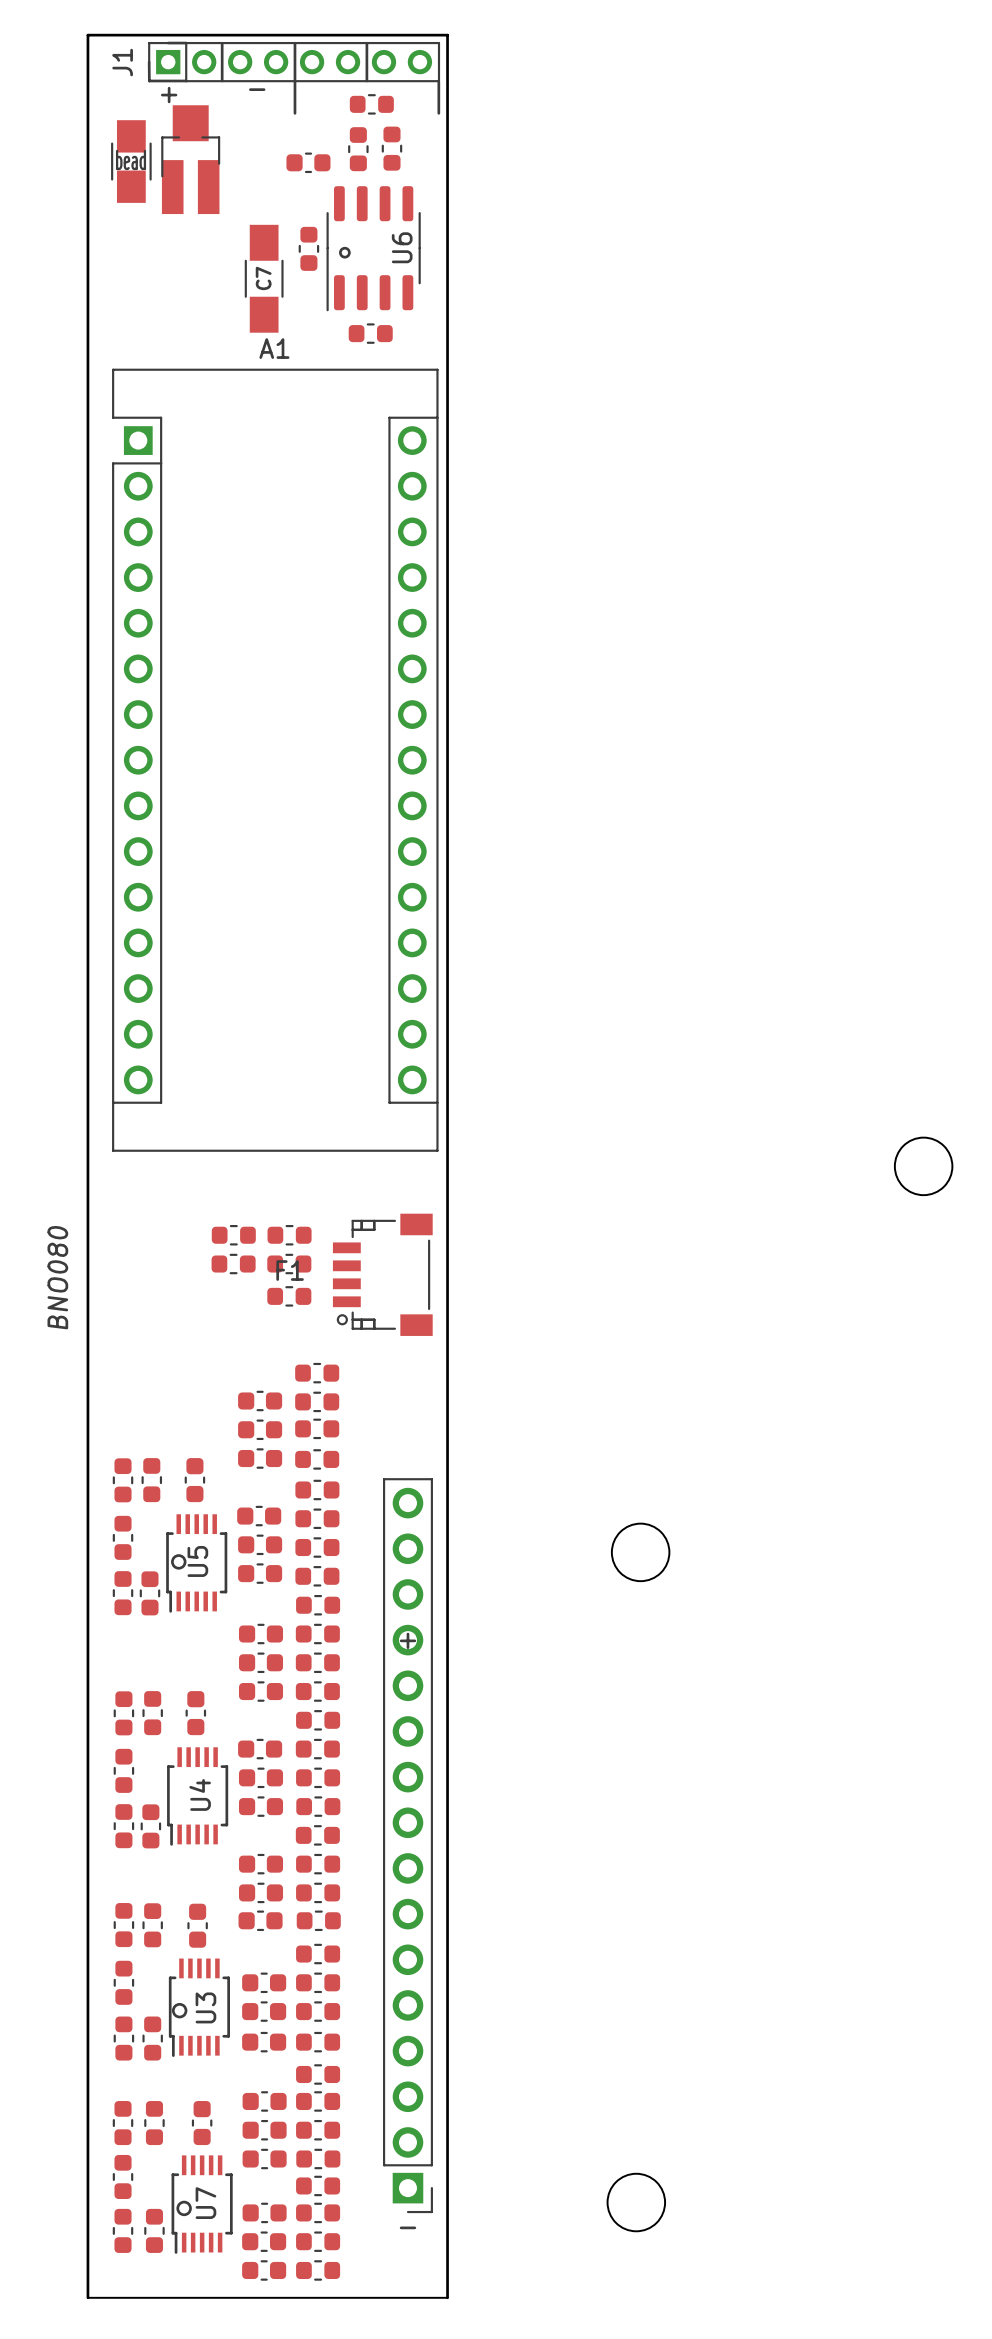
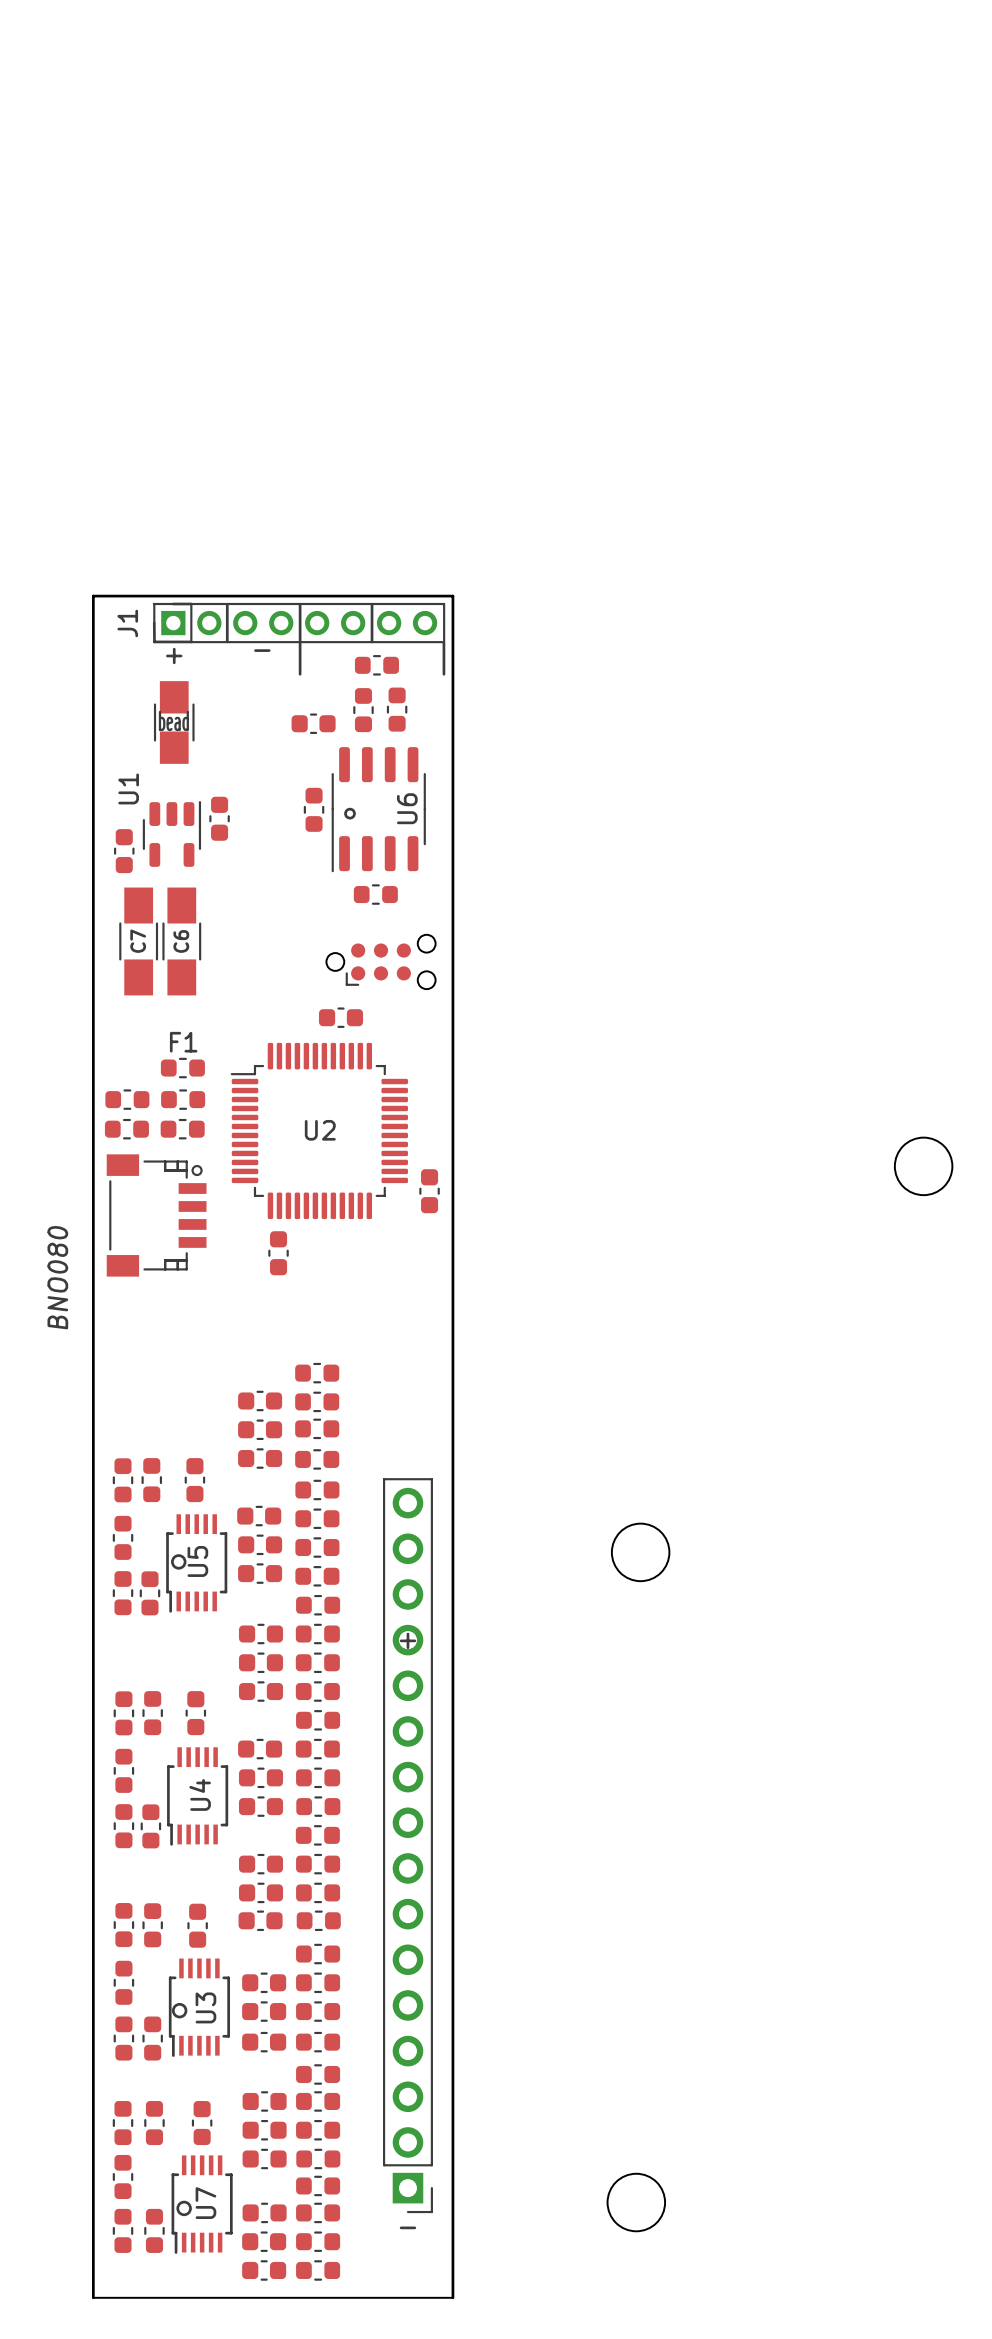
line: (168, 43) (186, 43) -> none
line: (222, 43) (222, 80) -> none
line: (294, 43) (294, 113) -> none
line: (366, 43) (366, 80) -> none
line: (149, 62) (149, 80) (186, 80) -> none
J1 position: (294, 62) -> (299, 623)
line: (438, 81) (438, 113) -> none
text: - (257, 89) -> none
text: + (169, 95) -> none
part: (371, 104) -> none
part: (391, 148) -> none
part: (358, 149) -> none
part: (190, 159) -> none
part: (131, 161) -> none
part: (308, 162) -> none
drawing: [339, 246, 351, 259] -> none
part: (308, 248) -> none
U6 position: (373, 248) -> (378, 809)
C7 position: (264, 278) -> (138, 941)
part: (370, 333) -> none
line: none -> (173, 604) (191, 604)
line: none -> (227, 604) (227, 641)
line: none -> (300, 604) (300, 674)
line: none -> (372, 604) (372, 641)
line: none -> (154, 623) (154, 641) (191, 641)
line: none -> (443, 642) (443, 674)
text: none -> - (262, 650)
text: none -> + (174, 655)
part: none -> (376, 665)
part: none -> (397, 709)
part: none -> (363, 710)
part: none -> (174, 722)
part: none -> (313, 723)
A1: (275, 760) -> none
drawing: none -> [344, 807, 356, 820]
part: none -> (314, 809)
part: none -> (219, 818)
U1: none -> (171, 833)
part: none -> (124, 851)
part: none -> (375, 894)
C6: none -> (181, 941)
part: none -> (381, 961)
part: none -> (341, 1017)
part: none -> (127, 1099)
part: none -> (183, 1099)
part: none -> (126, 1129)
part: none -> (182, 1129)
U2: none -> (319, 1130)
part: none -> (429, 1191)
part: (233, 1235) -> none
part: (289, 1235) -> none
part: none -> (278, 1253)
part: (233, 1264) -> none
part: (289, 1264) -> none
part rotation: 0° (382, 1274) -> 180° (156, 1215)
part position: (382, 1274) -> (156, 1215)
F1 position: (289, 1296) -> (182, 1068)
board edge: (93, 2297) (87, 2297) (87, 35) (447, 35) (447, 2297) -> (93, 2297) (93, 596) (452, 596) (452, 2297) (447, 2297)

